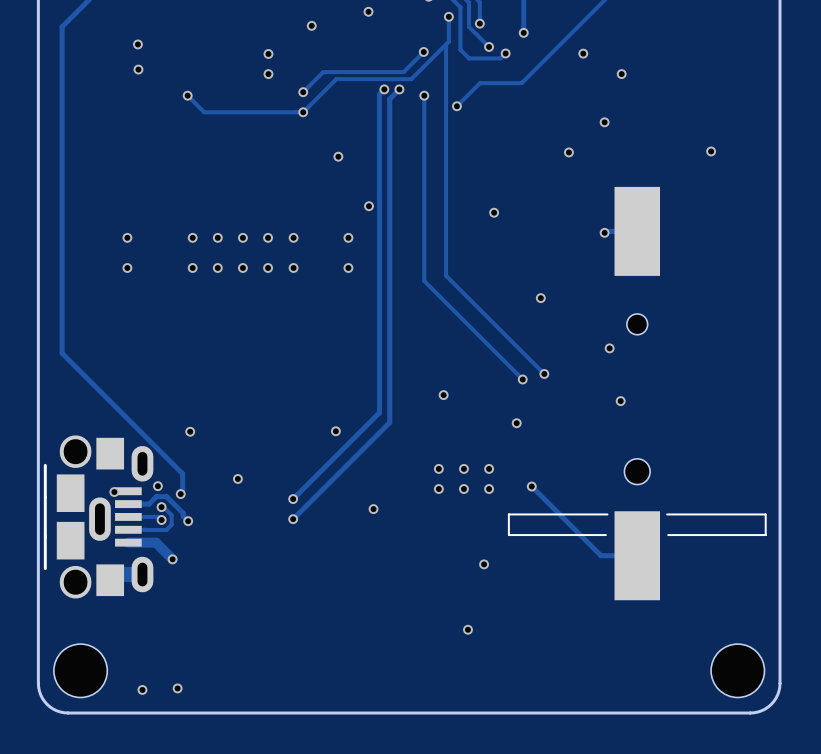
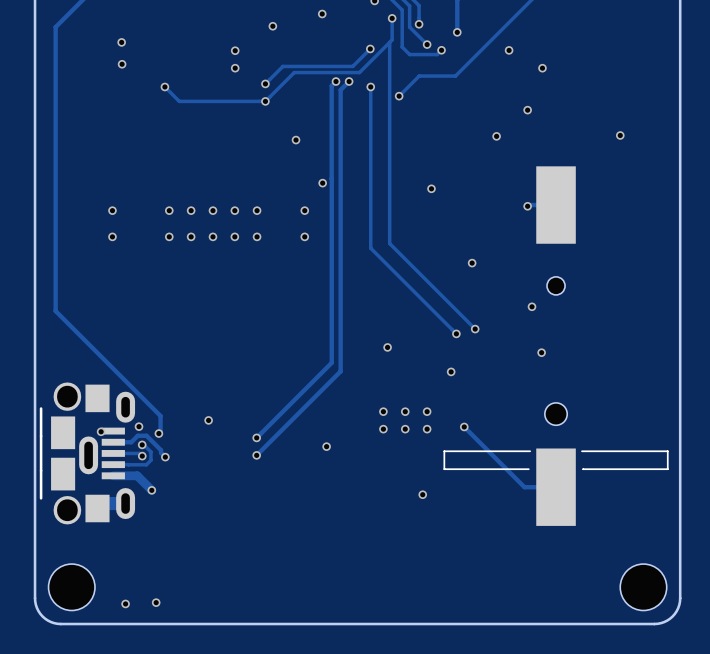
via: (190, 431) -> none
via: (335, 431) -> none
via: (467, 629) -> none

